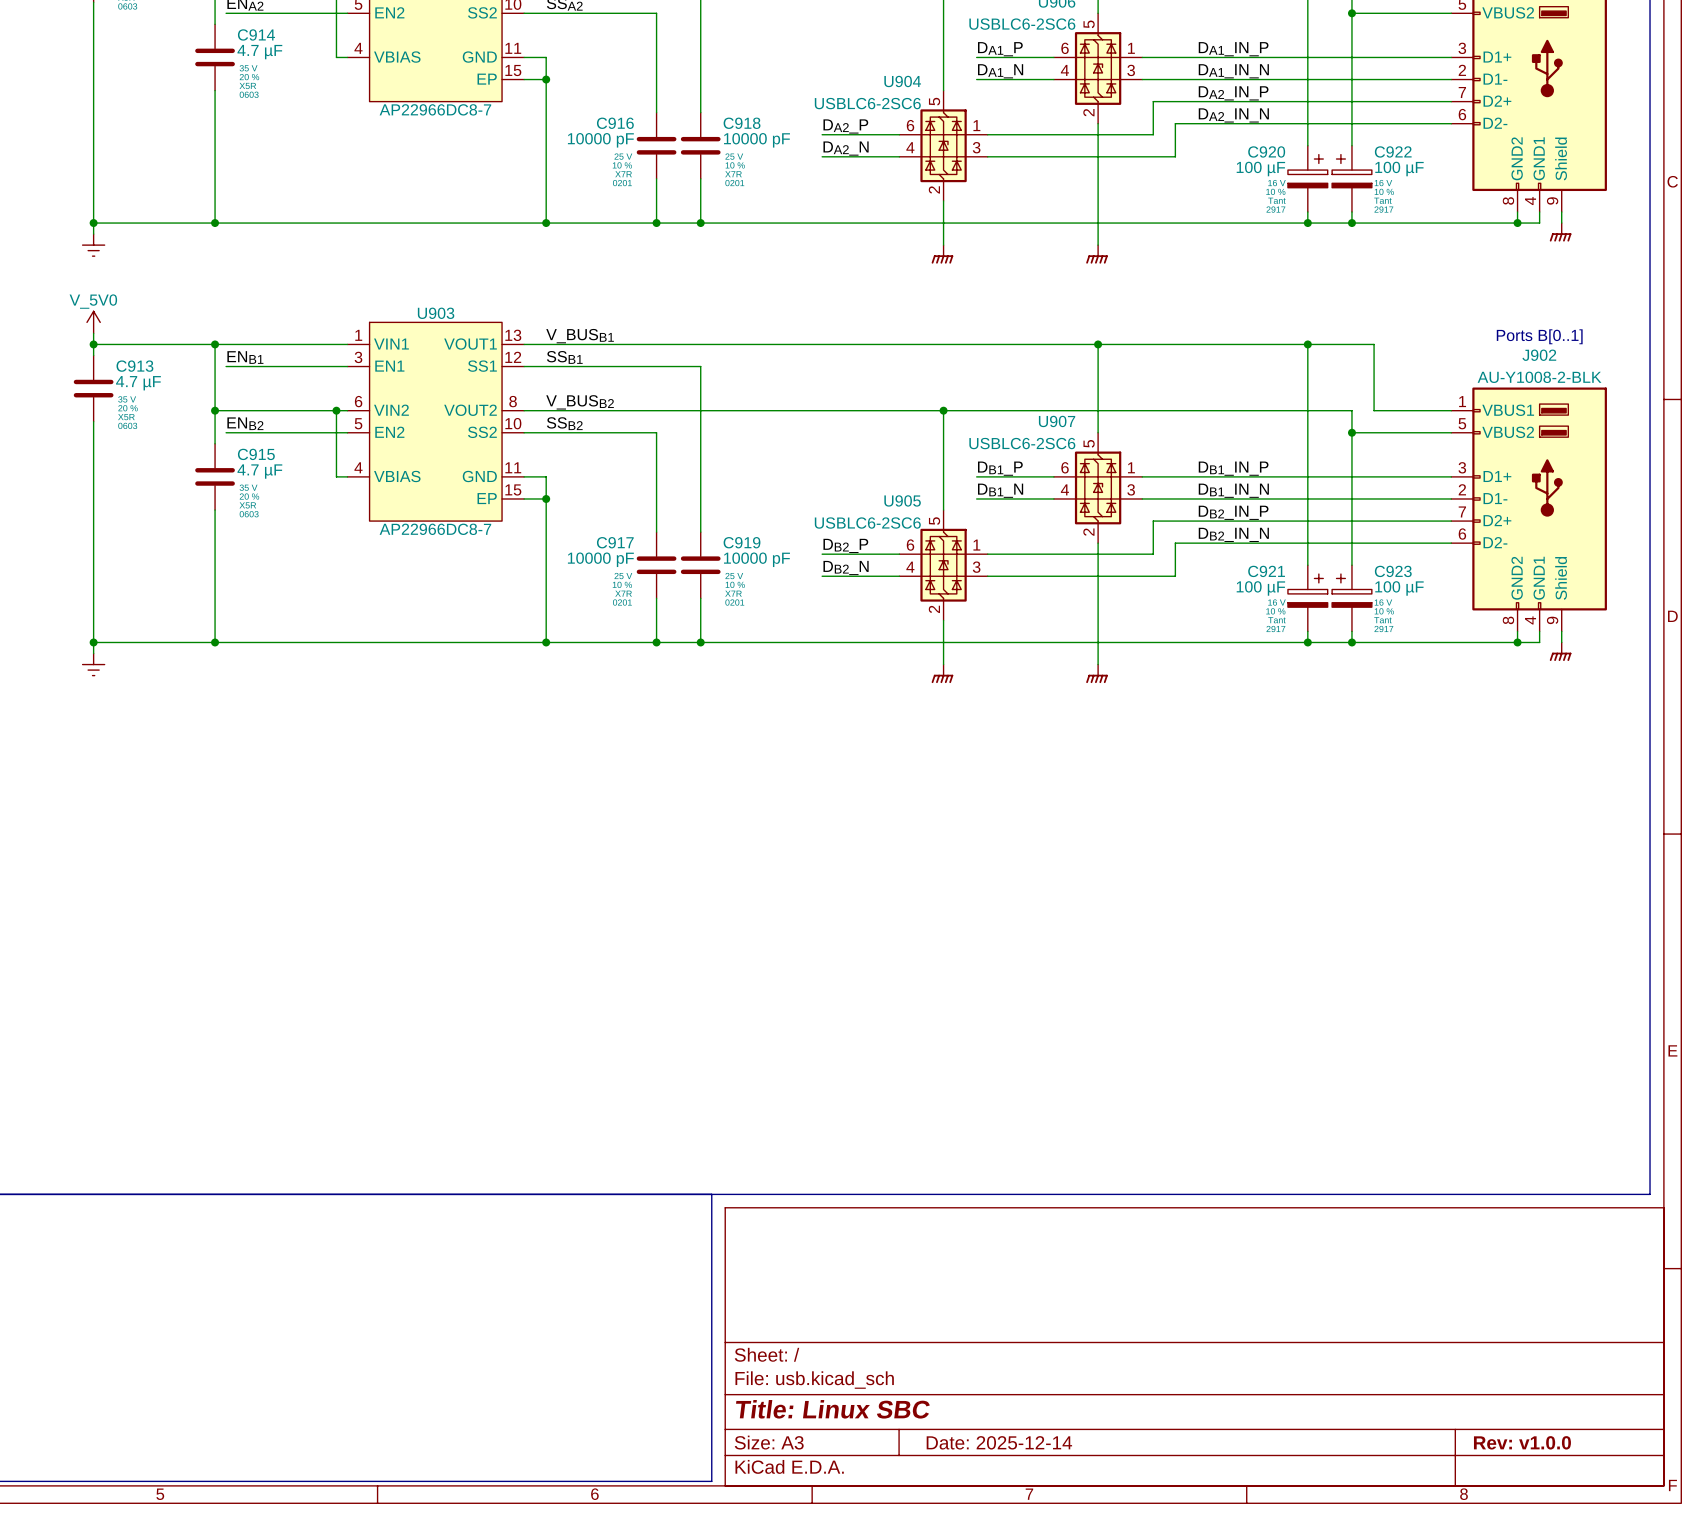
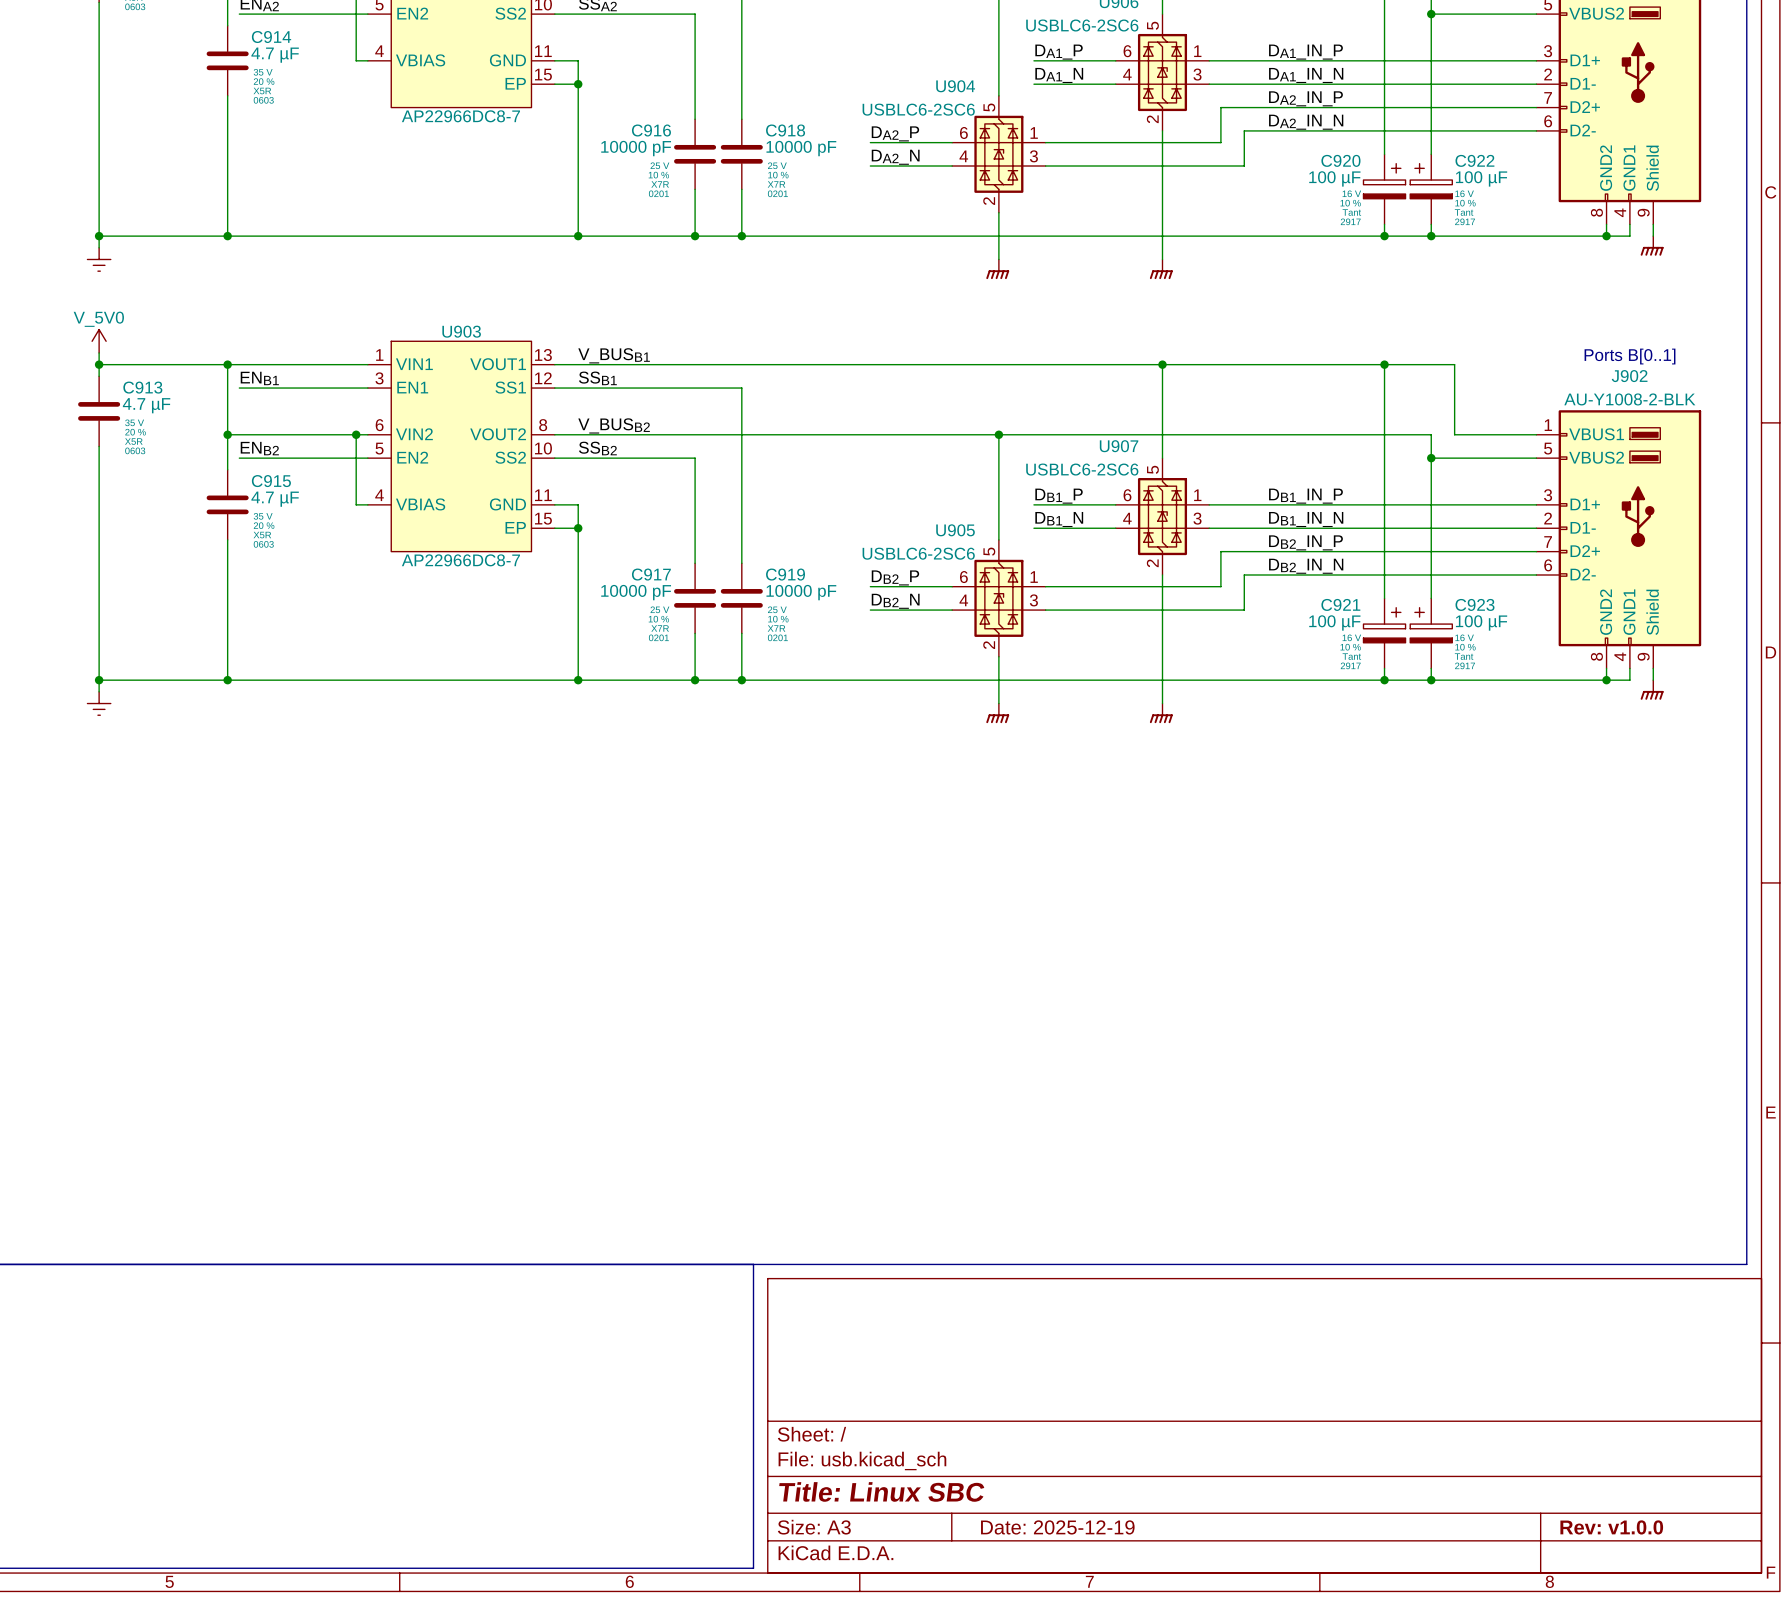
title block: Date: 2025-12-14 (999, 1442) -> Date: 2025-12-19 (1057, 1527)

